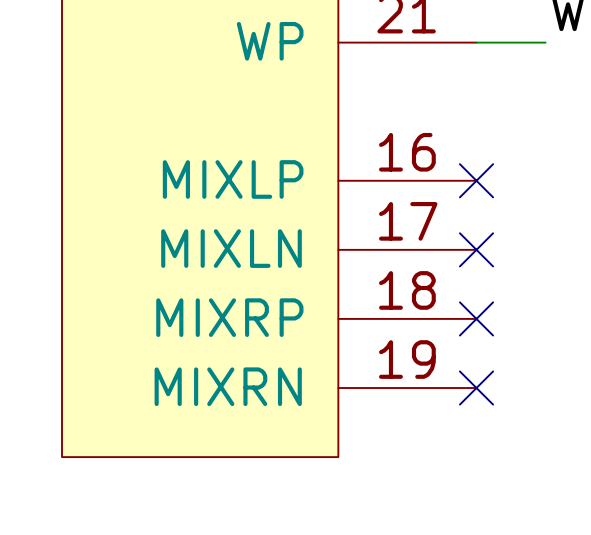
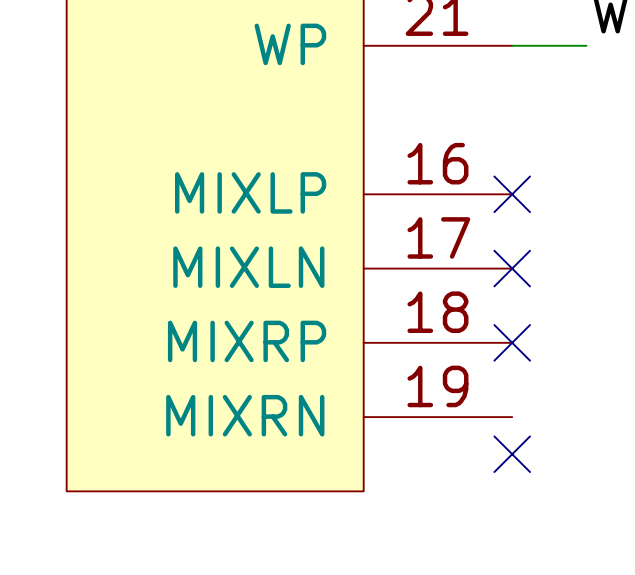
no-connect mark position: (476, 388) -> (512, 454)

